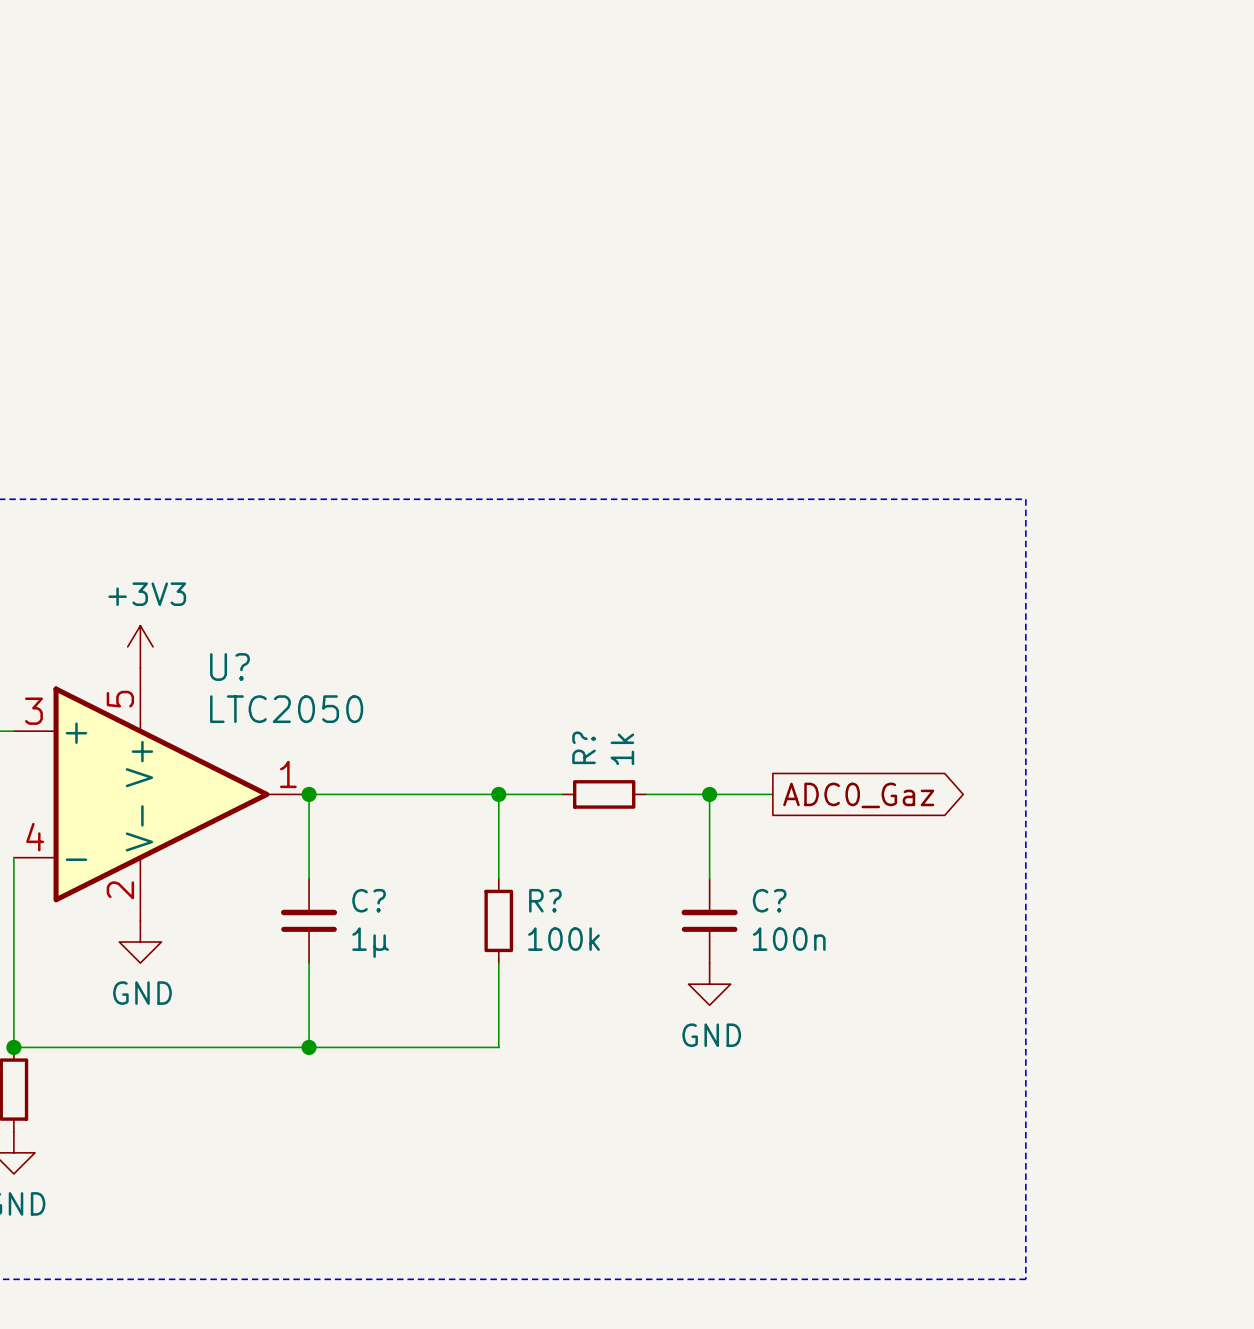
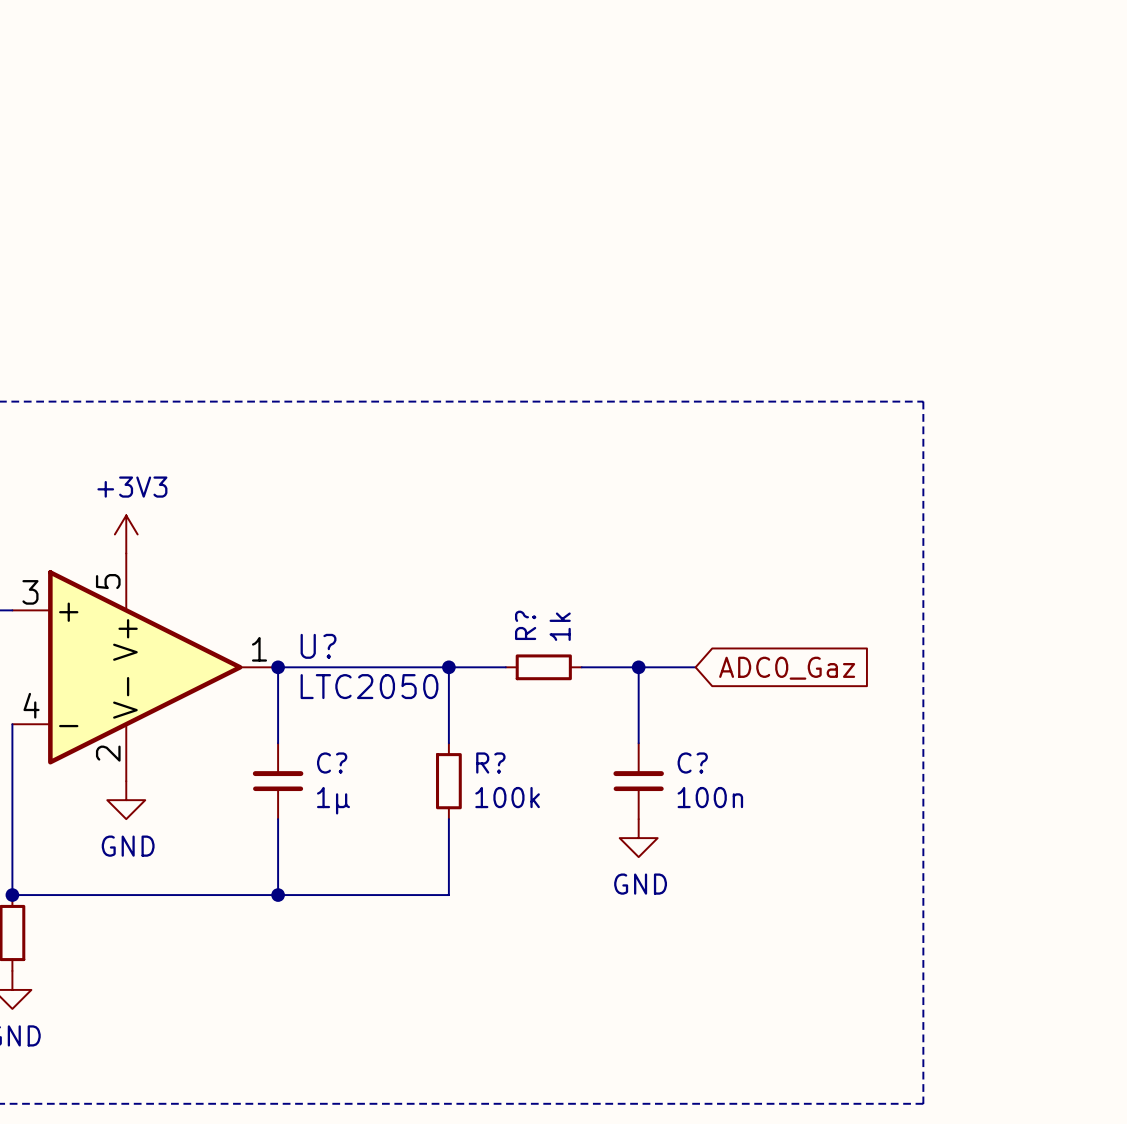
U? name position: U? (229, 666) -> U? (318, 646)
U? value position: LTC2050 (286, 709) -> LTC2050 (369, 686)
global label shape: output (858, 795) -> input (787, 668)

